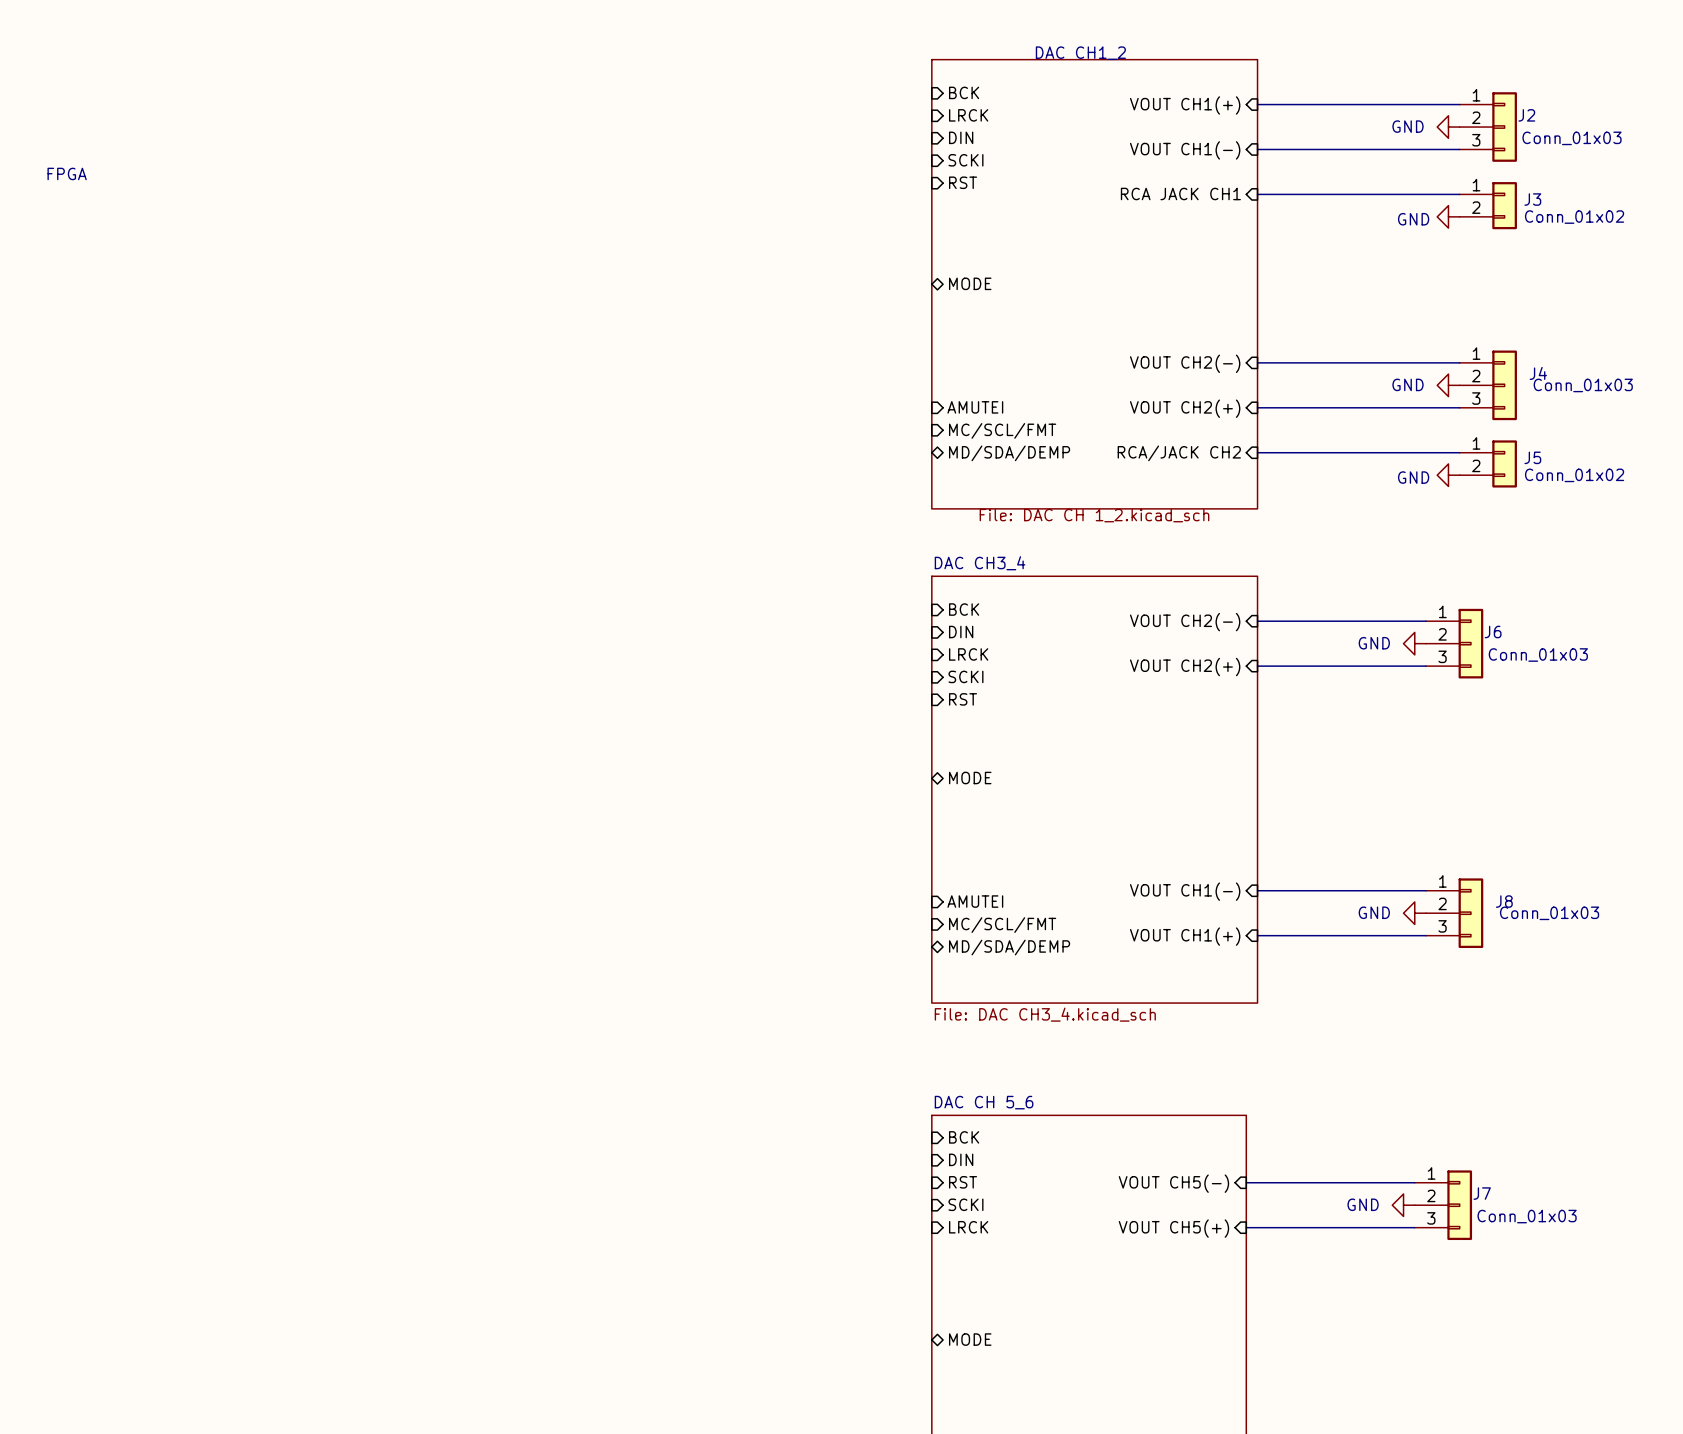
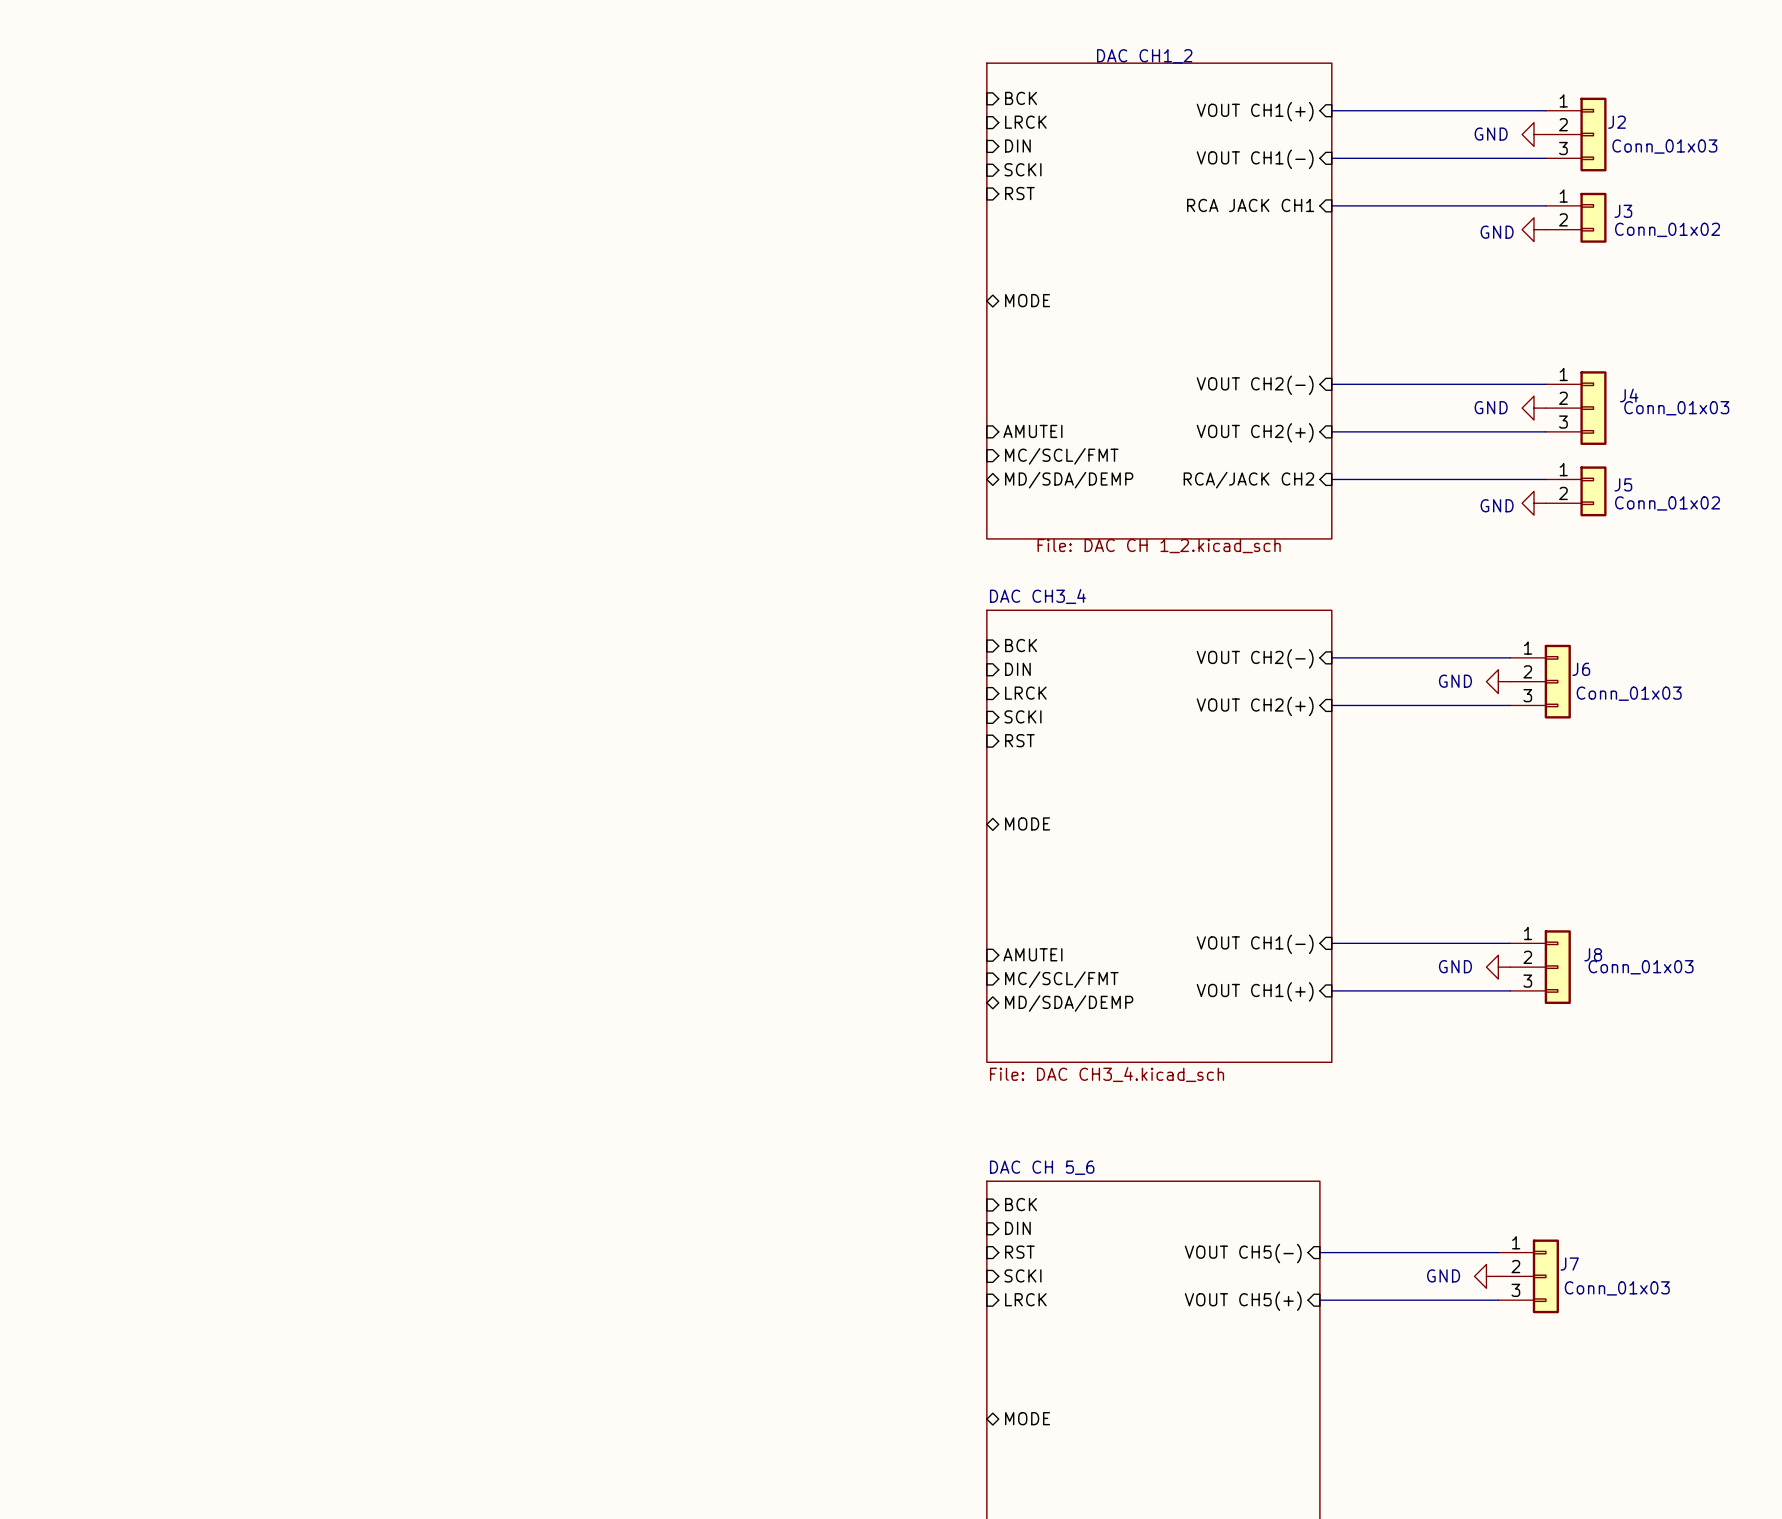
text: FPGA (67, 173) -> none

